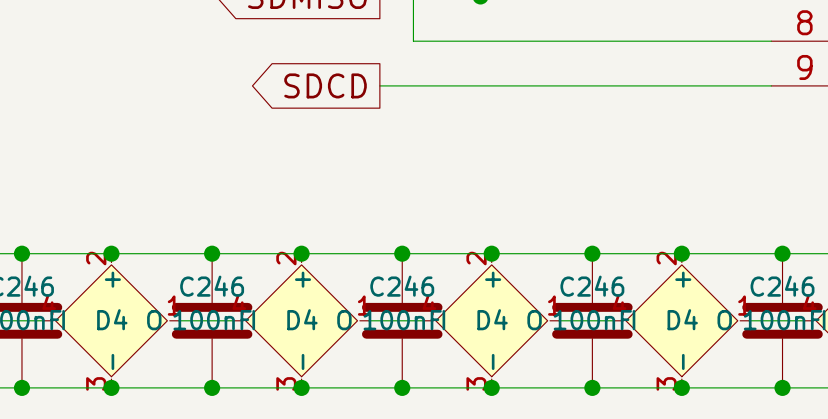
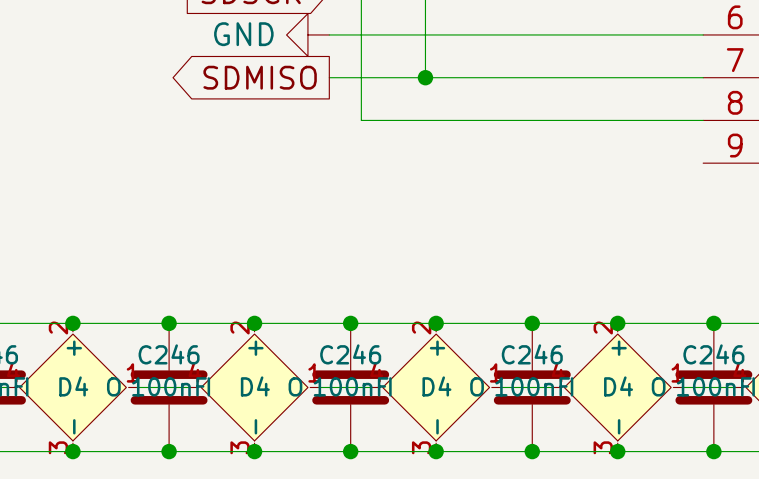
global label: SDCD (325, 85) -> none
wire: (379, 85) (771, 85) -> none

